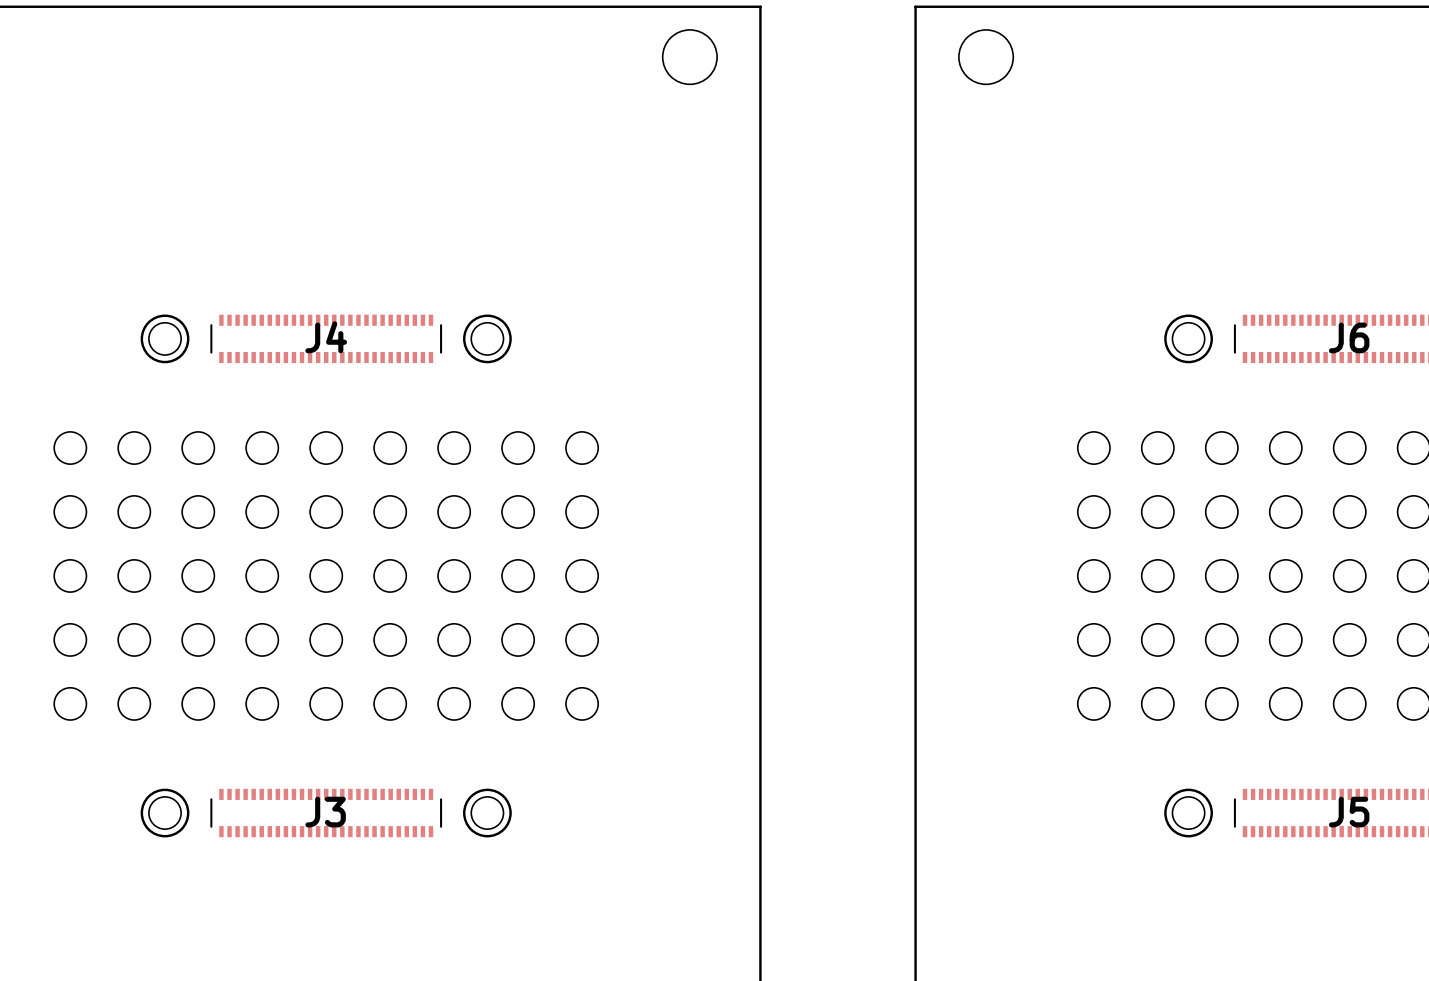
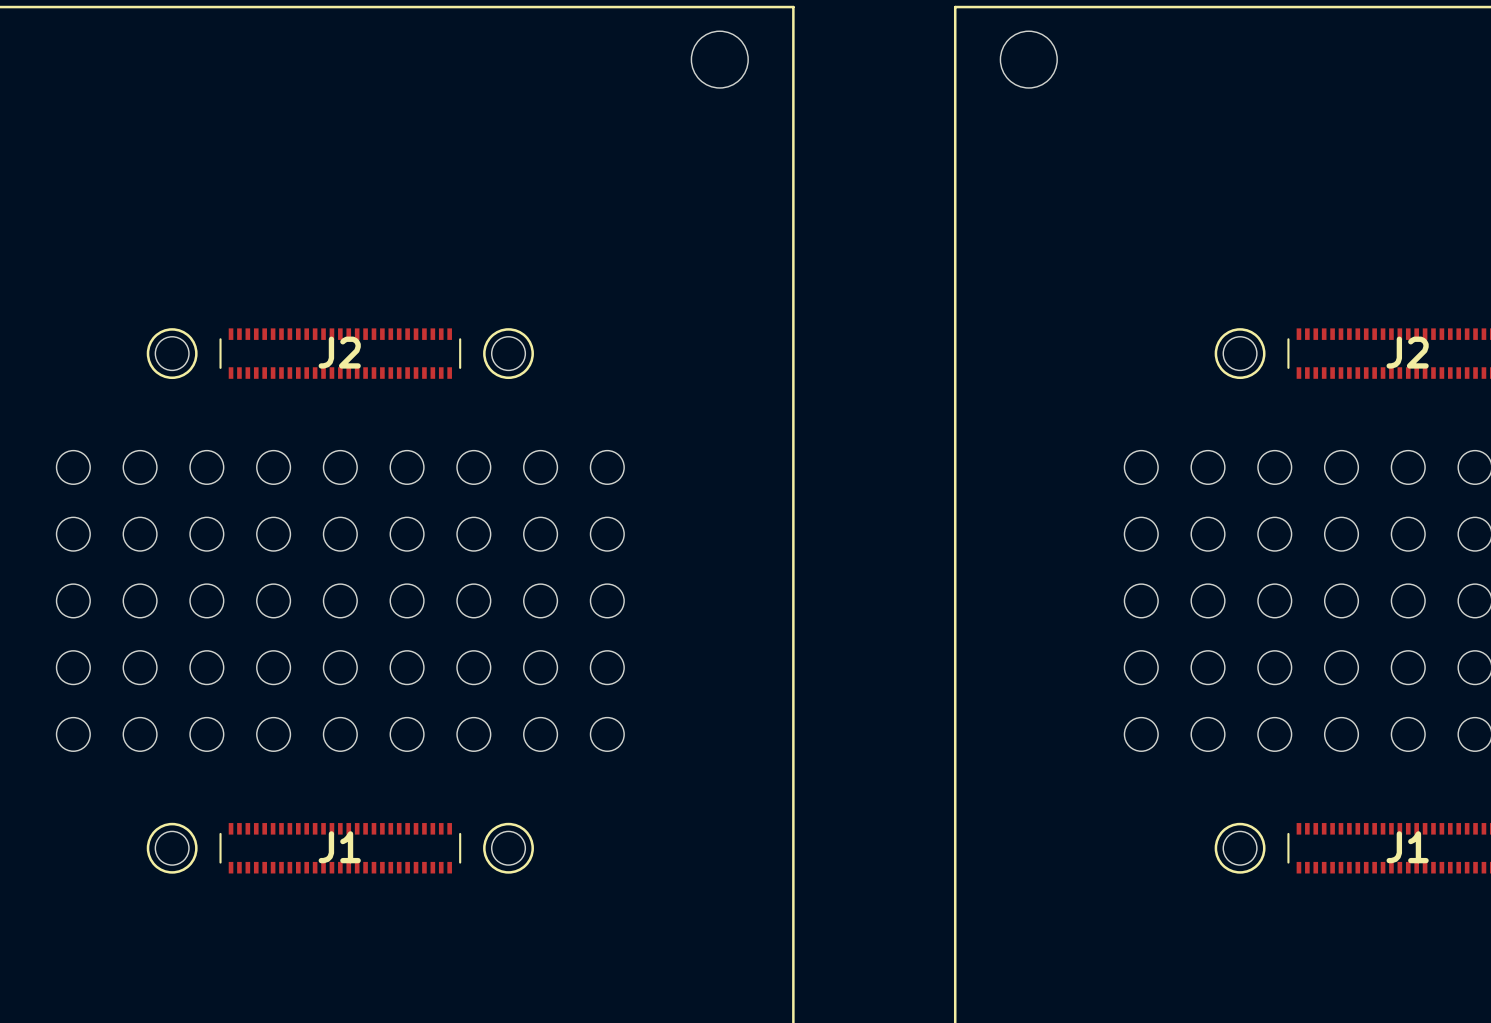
J4 name: J4 (326, 337) -> J2 (339, 352)
J6 name: J6 (1349, 337) -> J2 (1407, 352)
J3 name: J3 (325, 812) -> J1 (339, 847)
J5 name: J5 (1349, 812) -> J1 (1407, 847)

